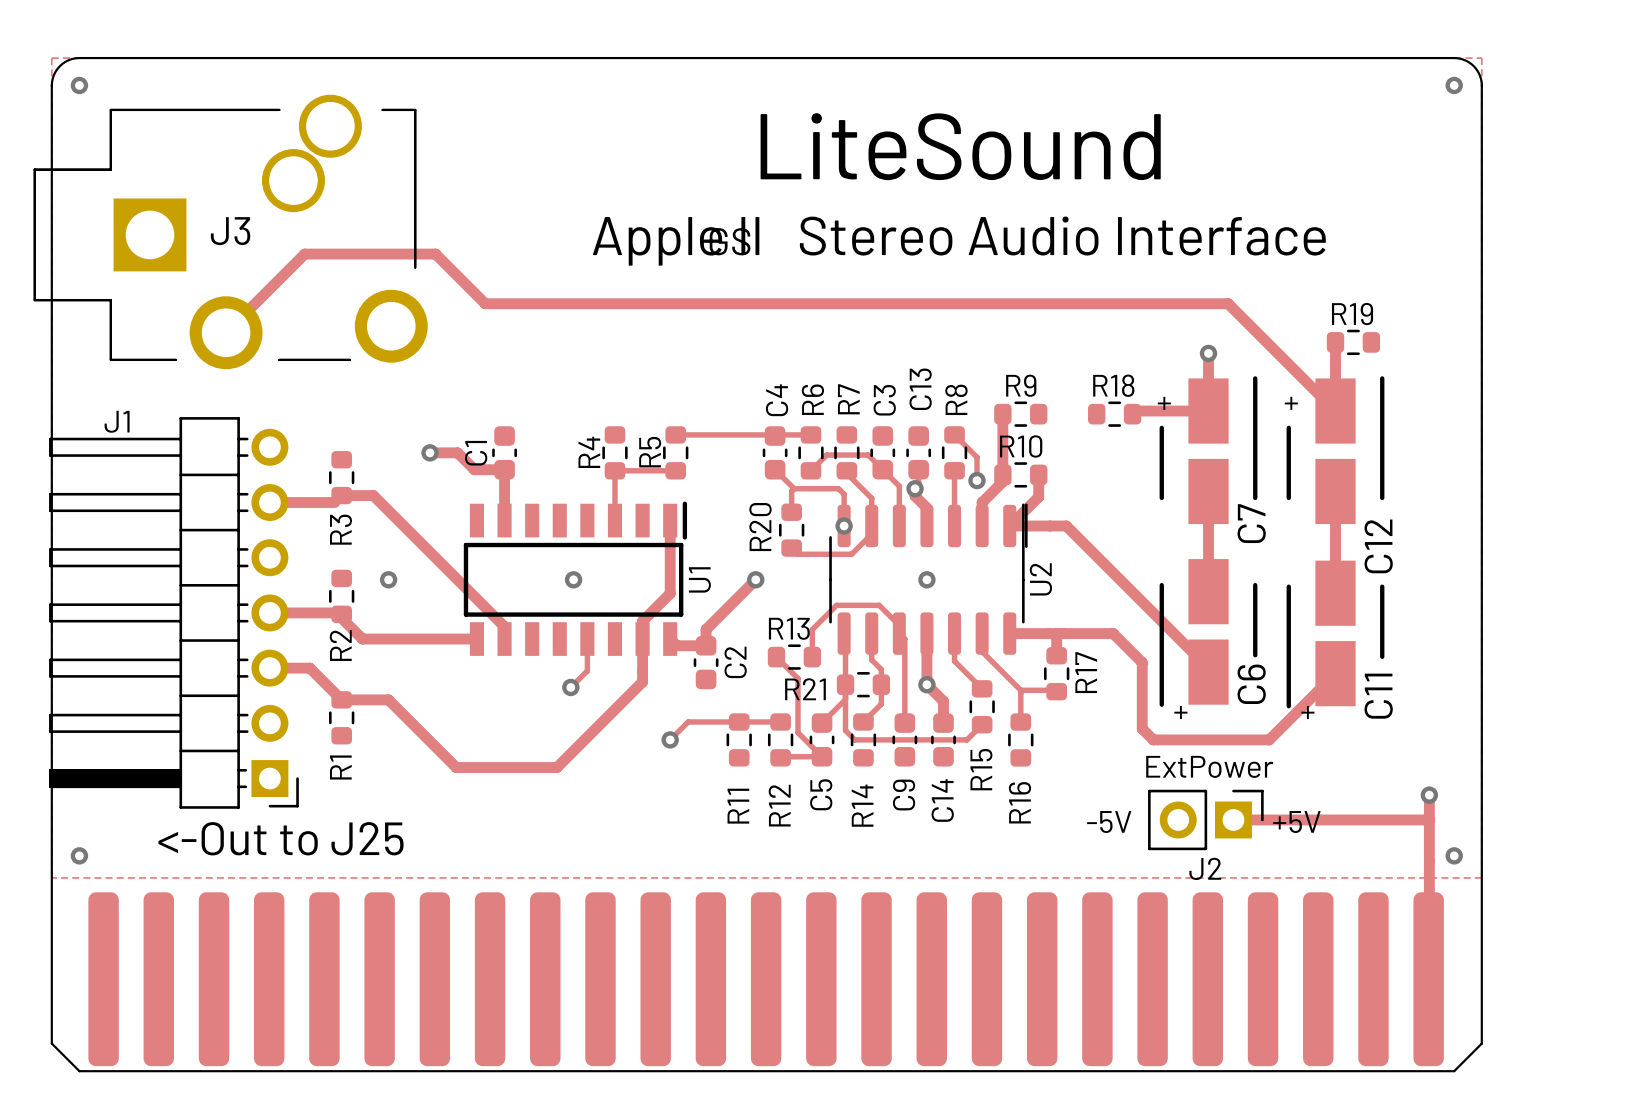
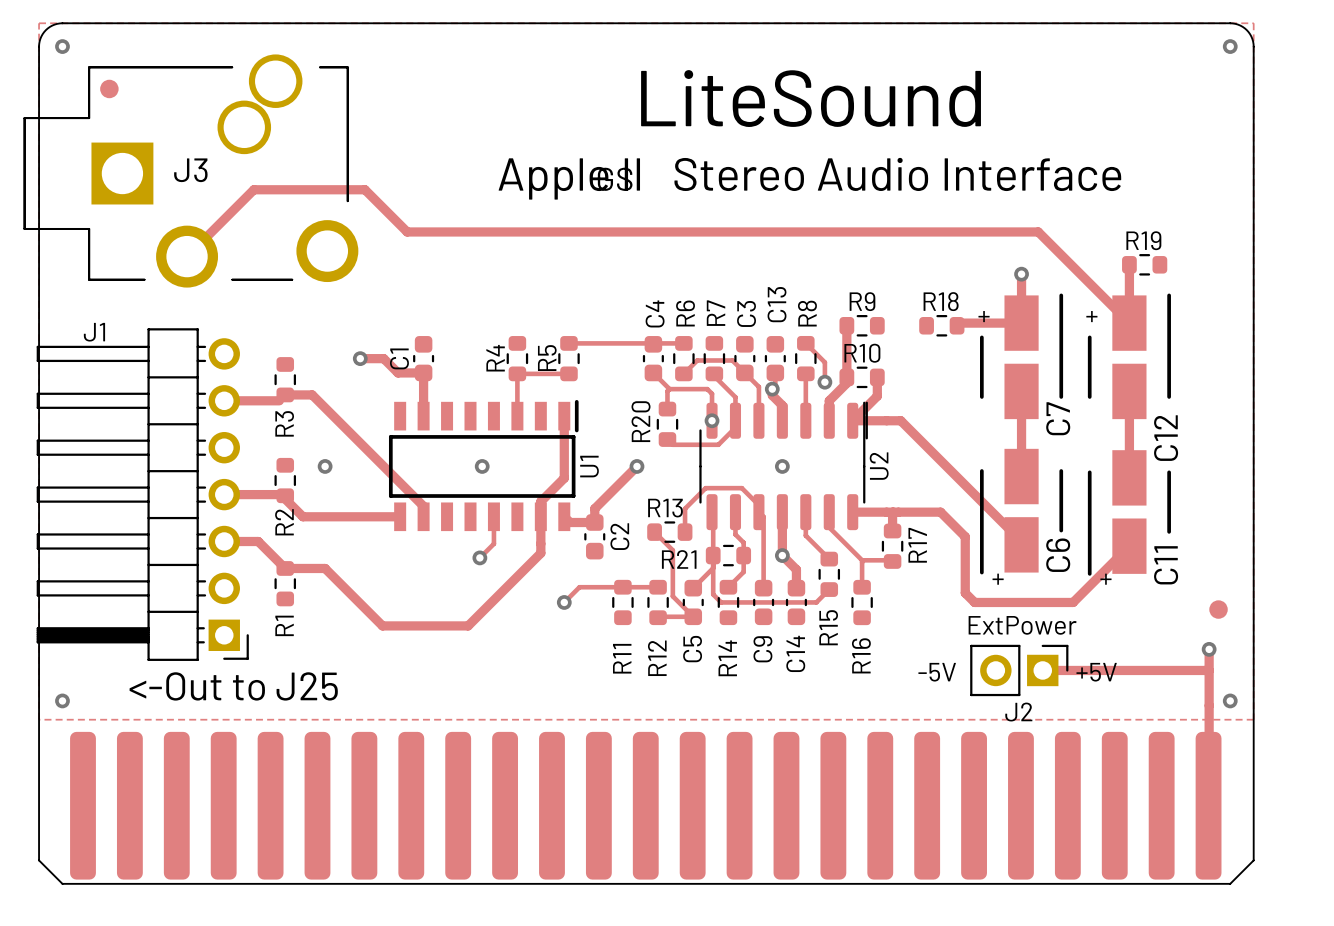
part: none -> (109, 88)
part: none -> (1218, 609)

